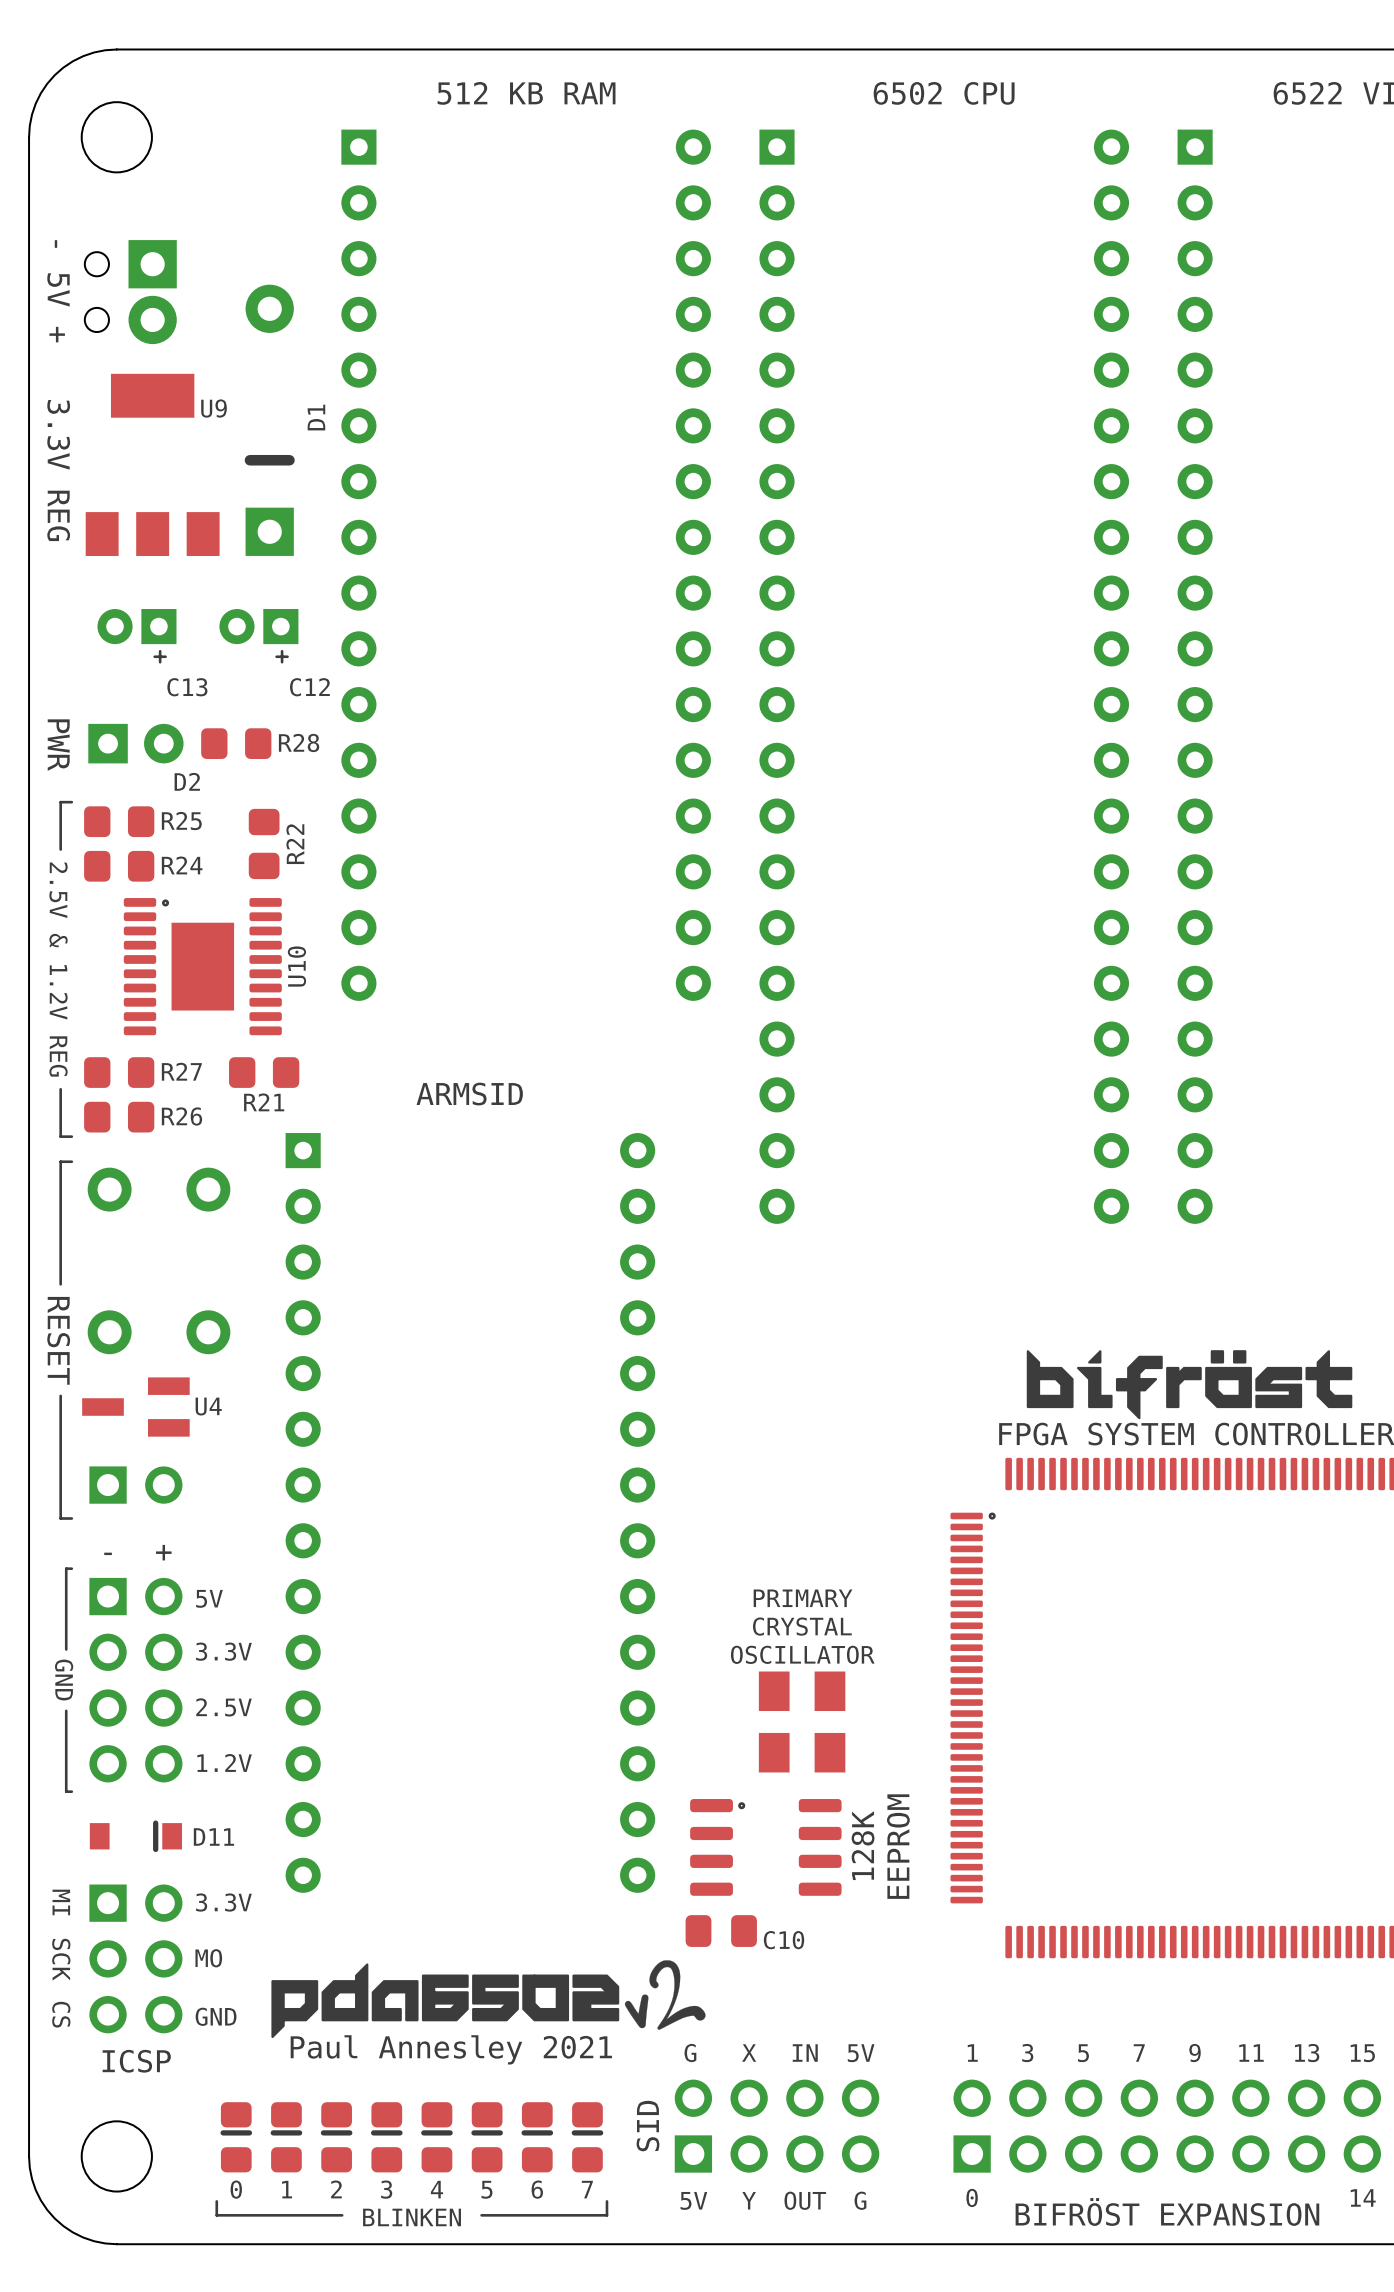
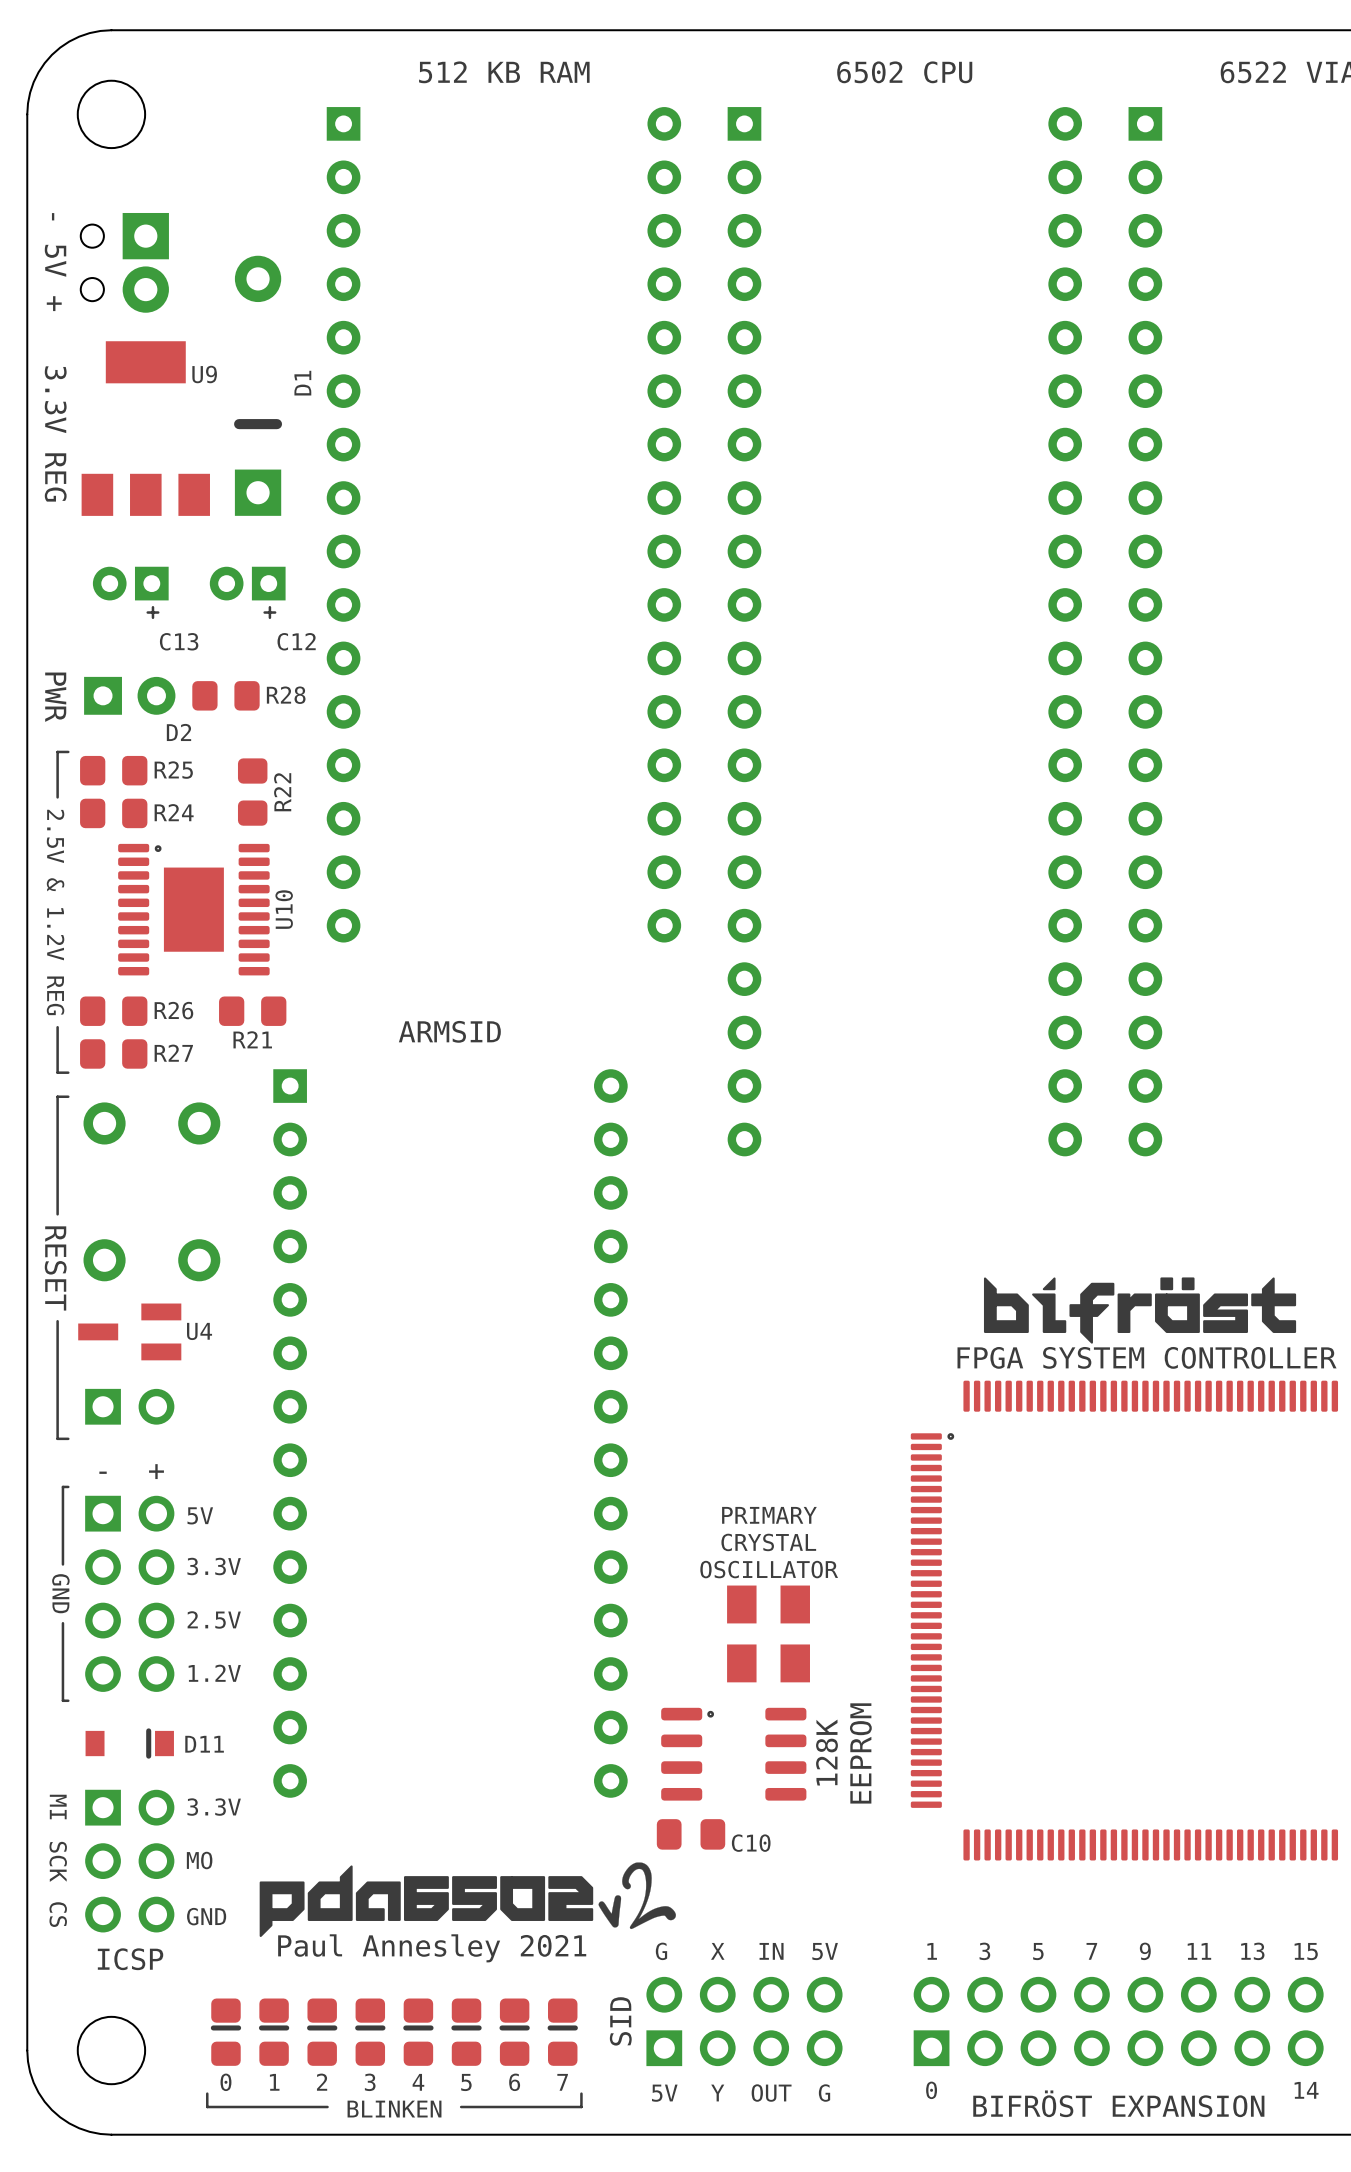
R27 name position: R27 (181, 1071) -> R27 (173, 1053)
R26 name position: R26 (181, 1116) -> R26 (173, 1010)

